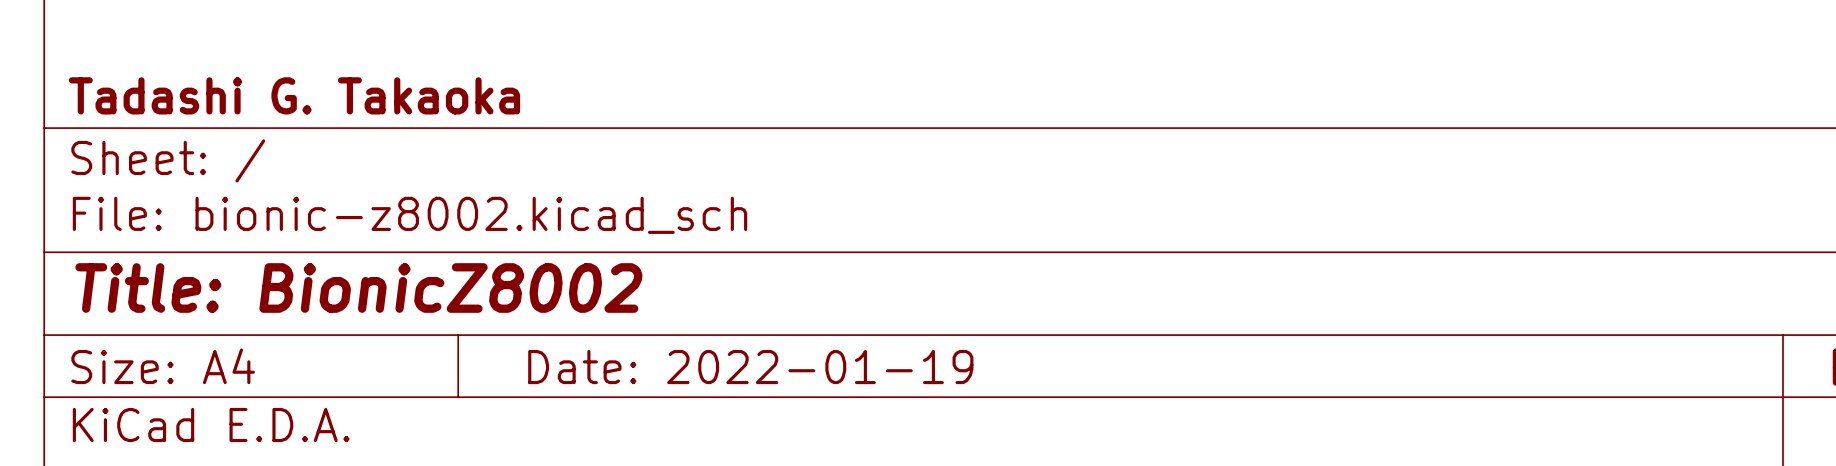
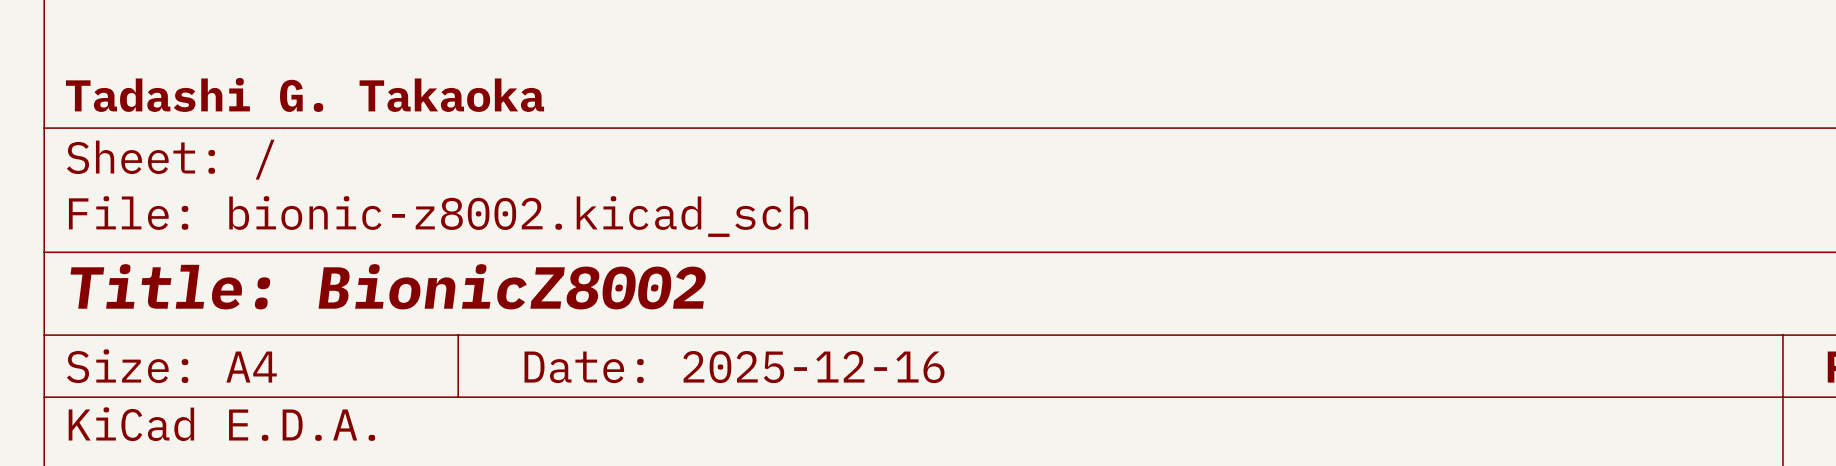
title block: Date: 2022-01-19 (750, 367) -> Date: 2025-12-16 (734, 367)

